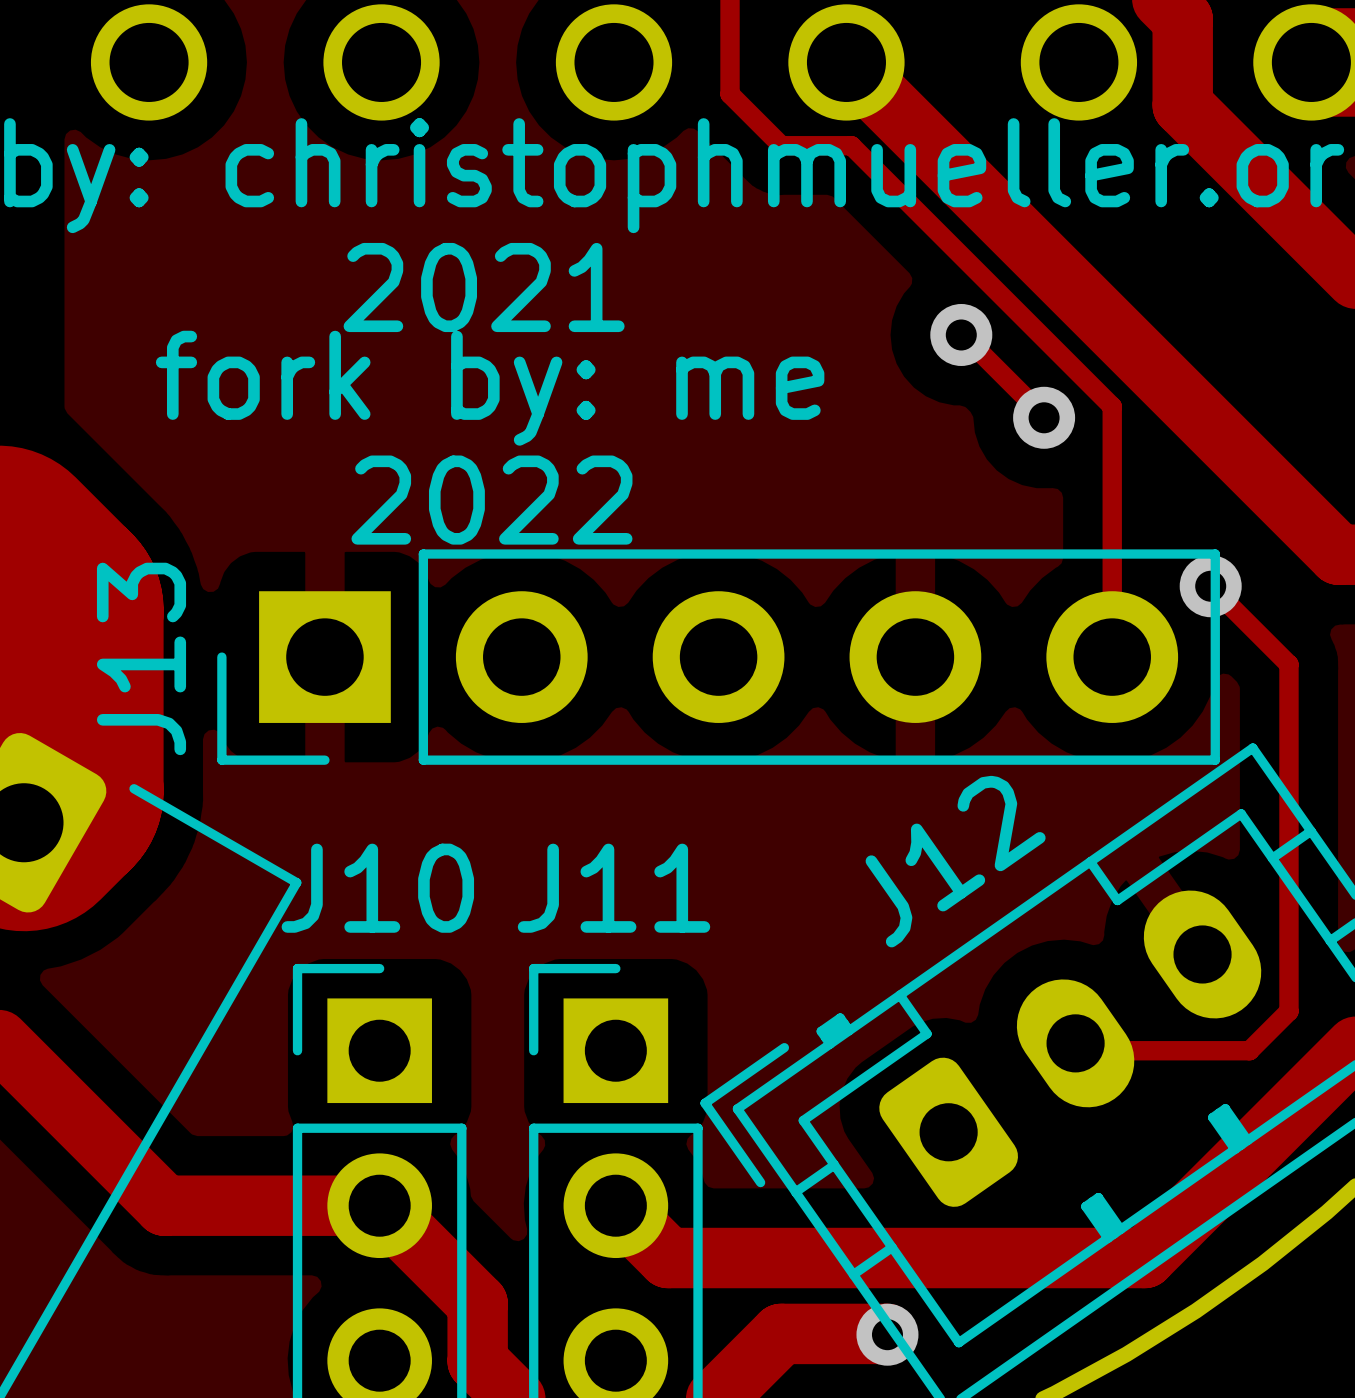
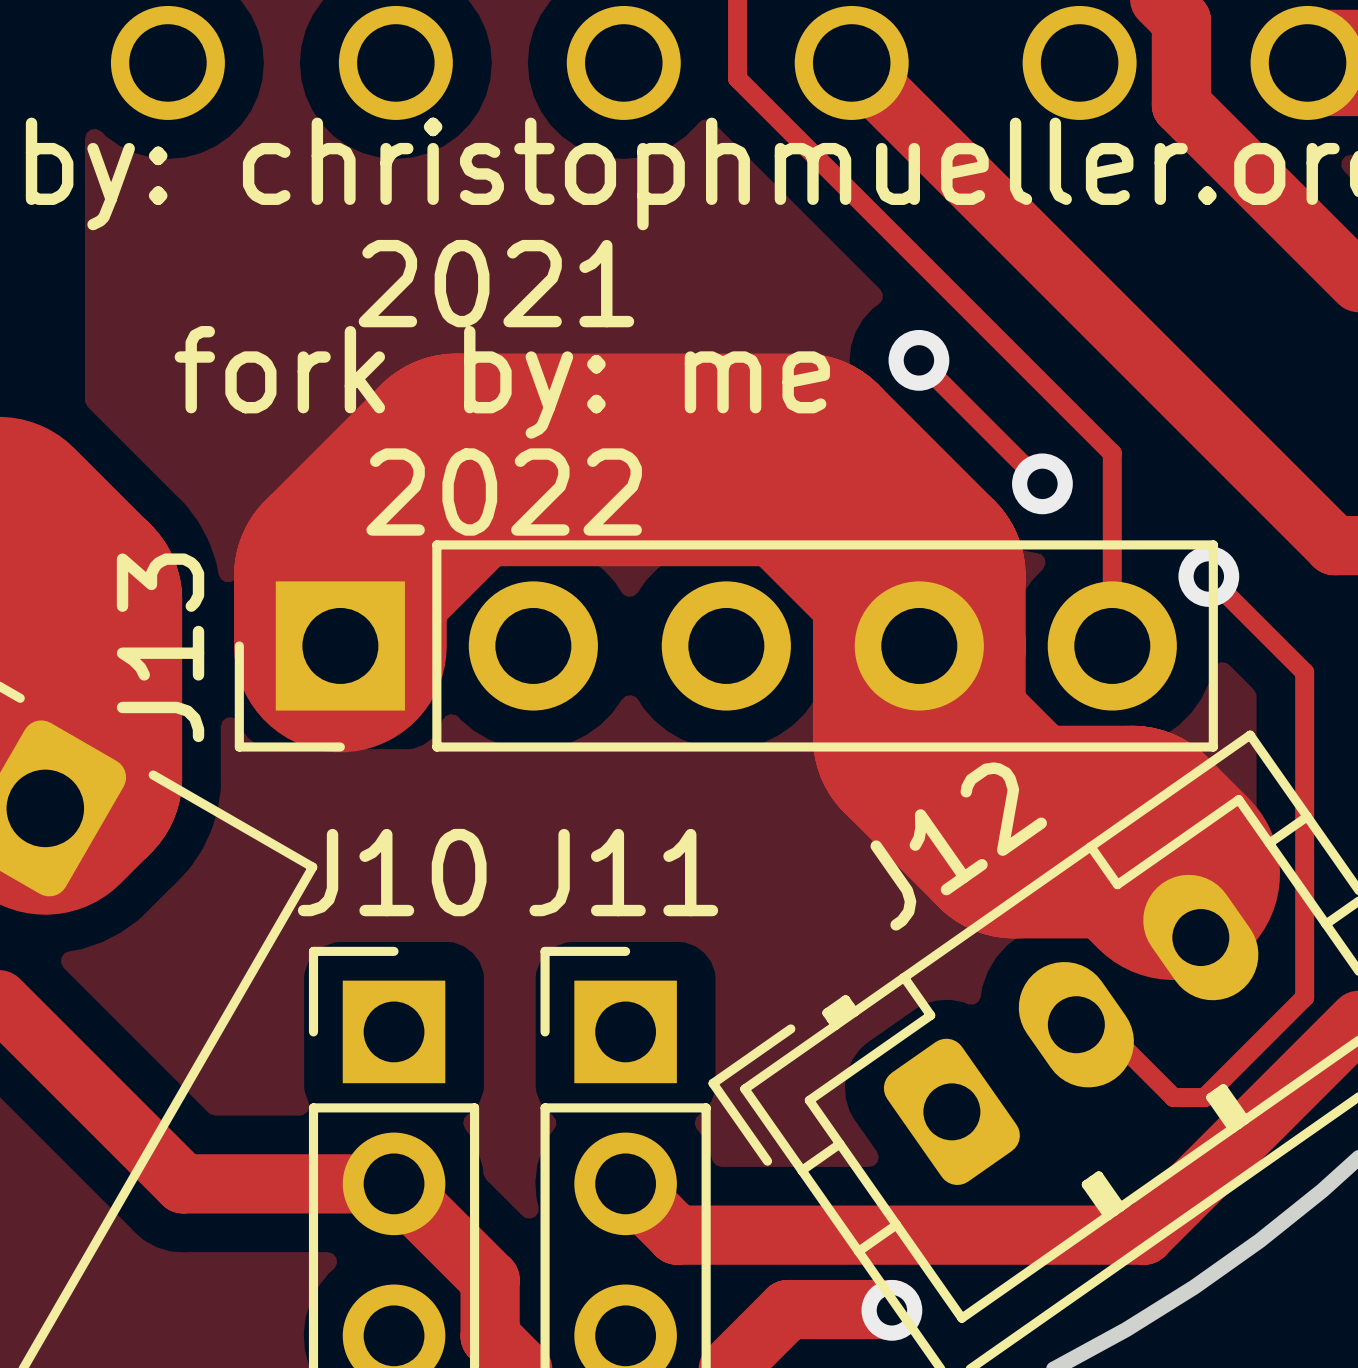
track: (730, 78) (730, 94) (781, 145) (851, 145) (1112, 406) (1112, 460) -> (737, 78) (1112, 453)
track: (961, 334) (1044, 417) -> none
via position: (961, 334) -> (918, 360)
track: none -> (918, 360) (1042, 483)
via: (1044, 417) -> none
via: none -> (1042, 483)
track: none -> (340, 645) (340, 575) (456, 459) (803, 459) (919, 575) (919, 737) (1014, 832) (1132, 832) (1173, 873)
track: (1288, 664) (1288, 1011) (1249, 1050) (1107, 1050) -> (1285, 653) (1304, 672) (1304, 997) (1204, 1097) (1173, 1097) (1108, 1031)

